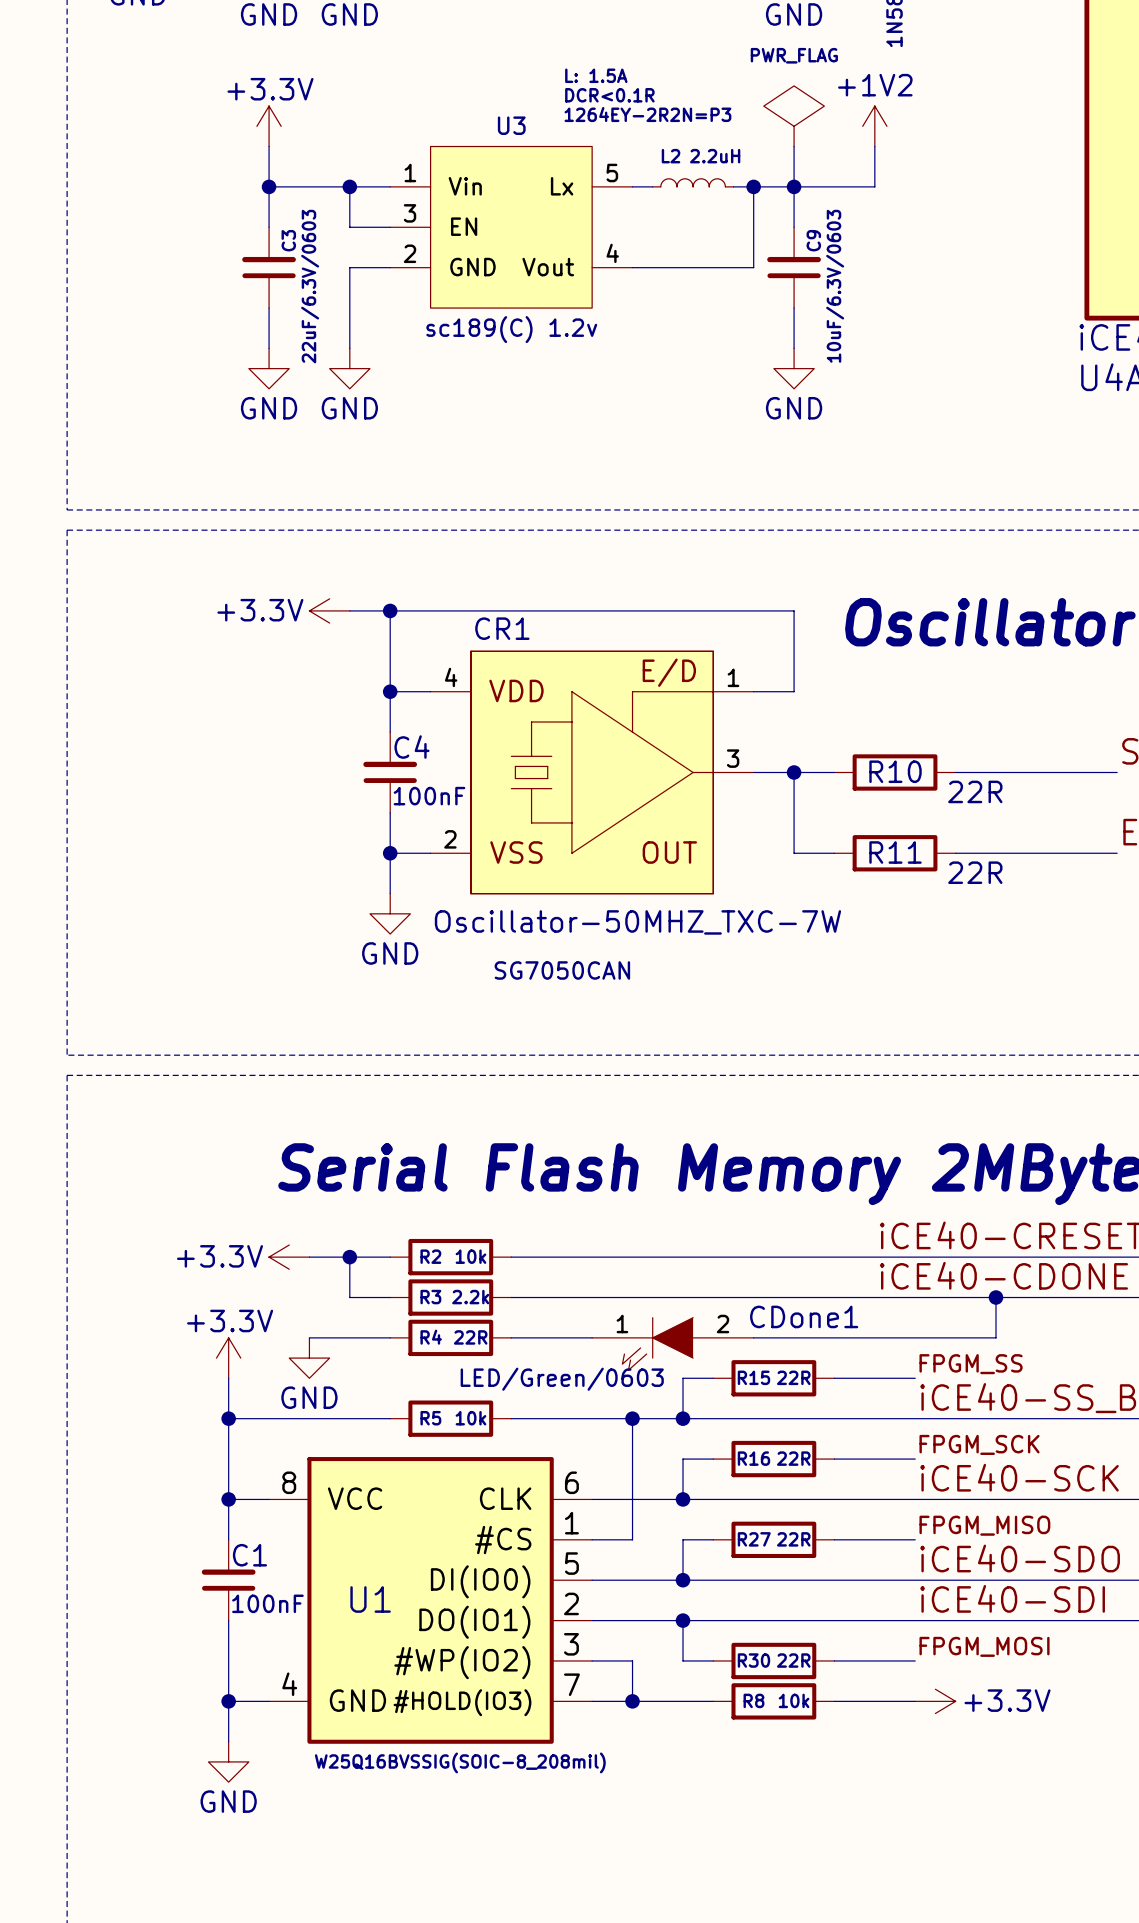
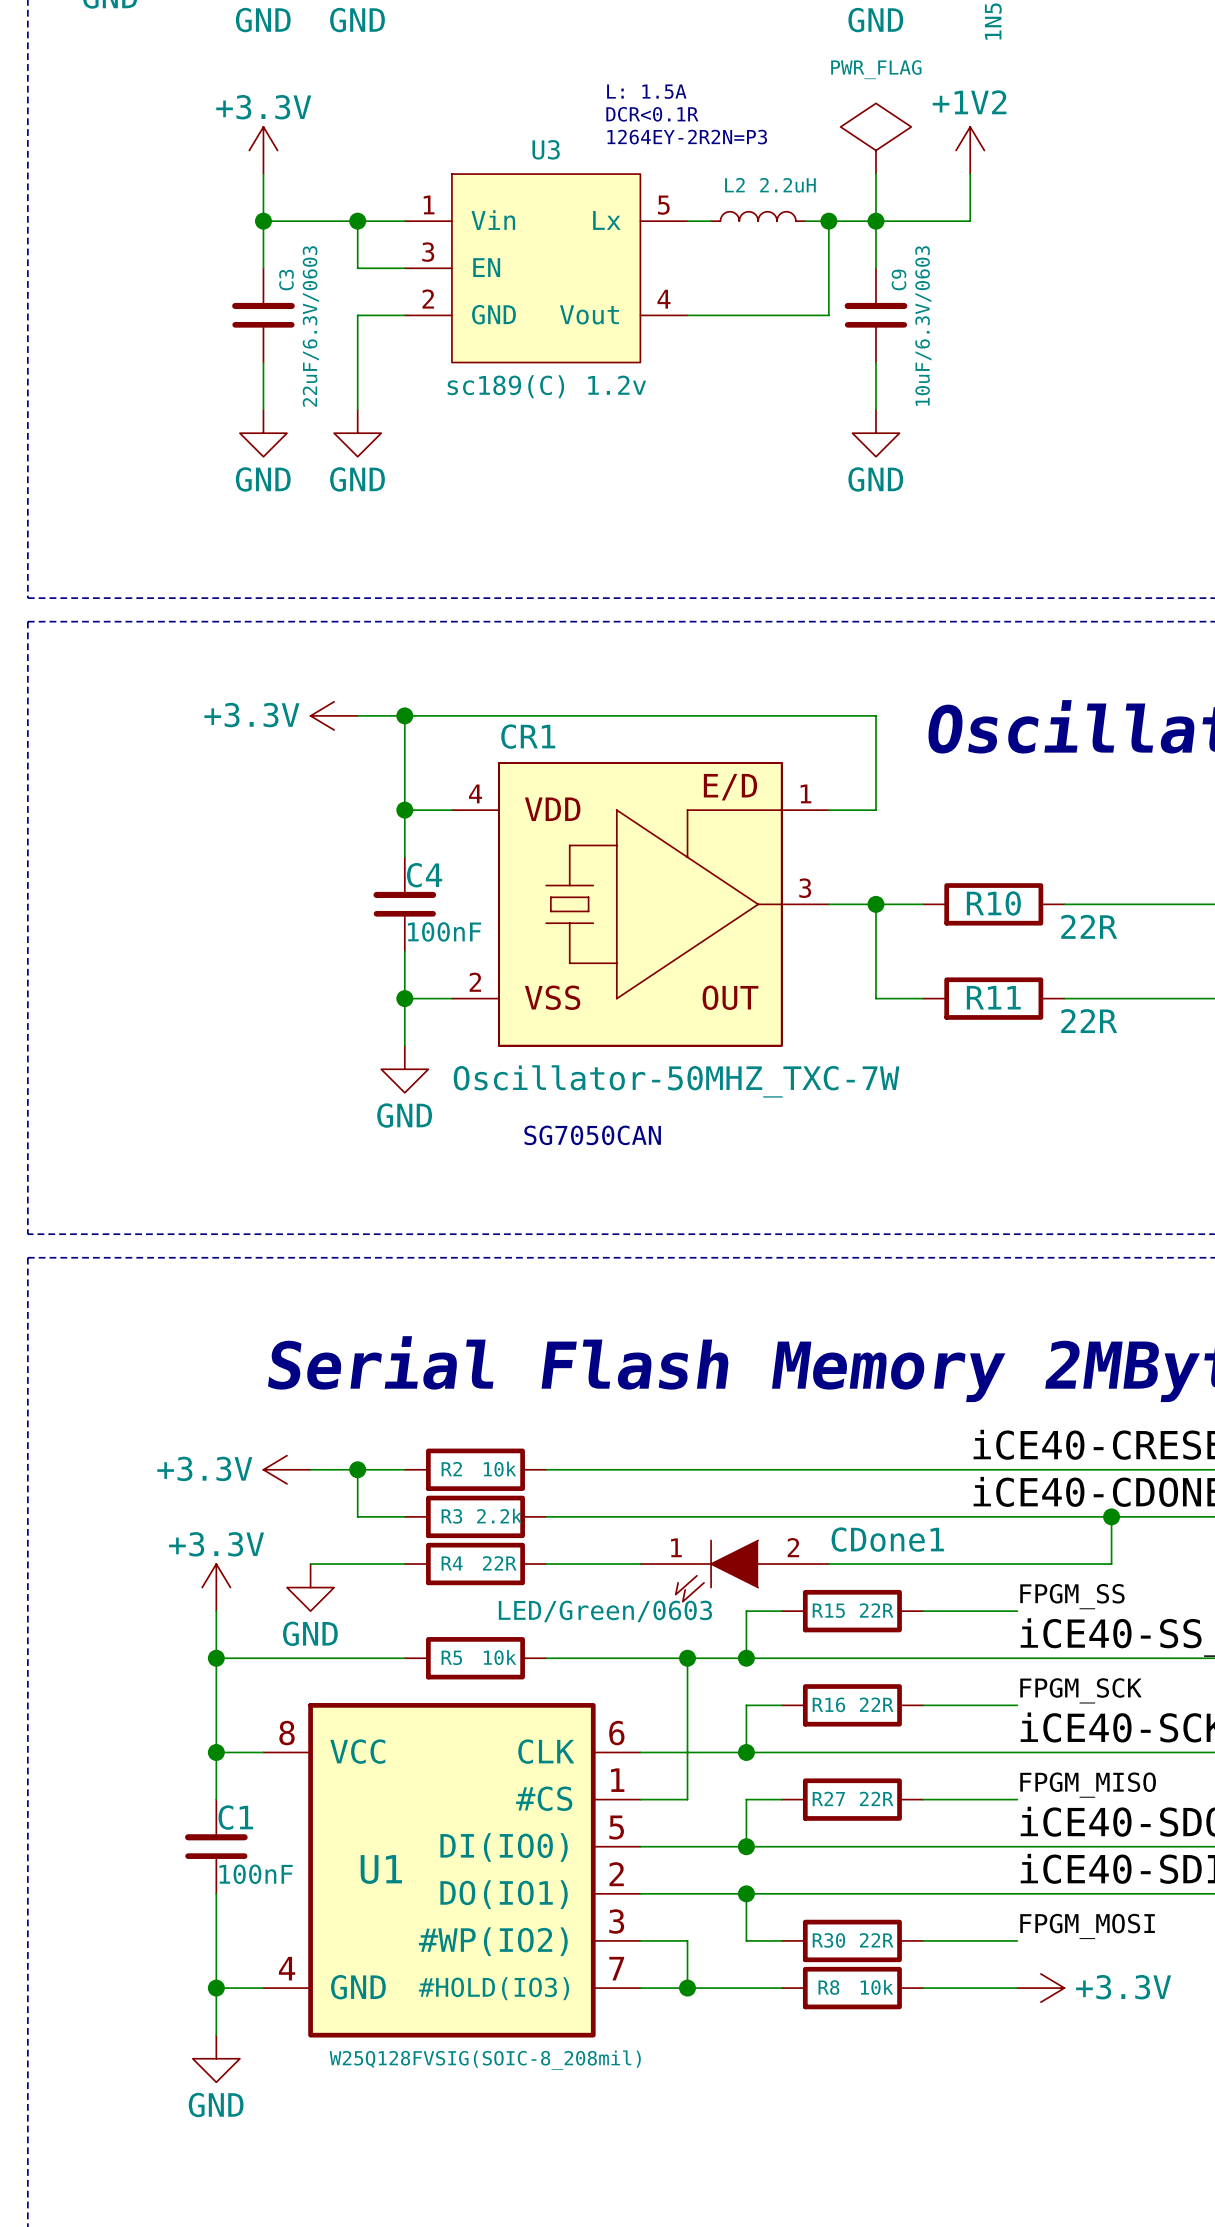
U1 value: W25Q16BVSSIG(SOIC-8_208mil) (460, 1762) -> W25Q128FVSIG(SOIC-8_208mil) (485, 2060)

